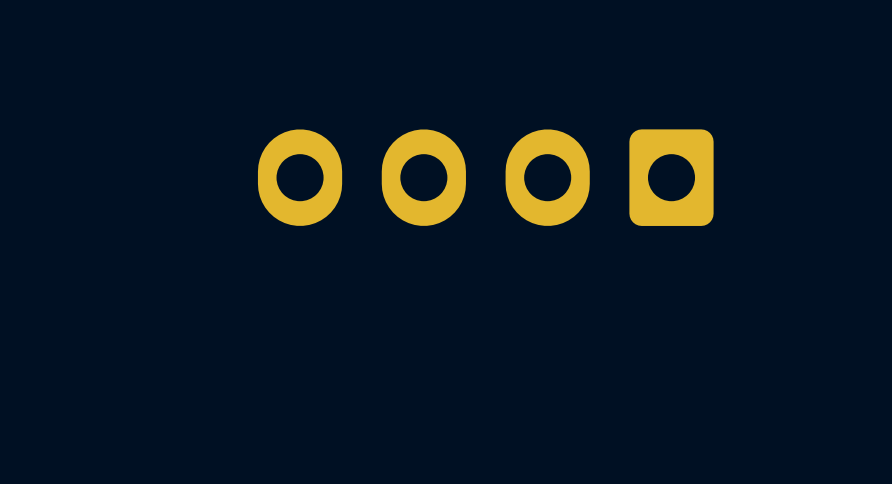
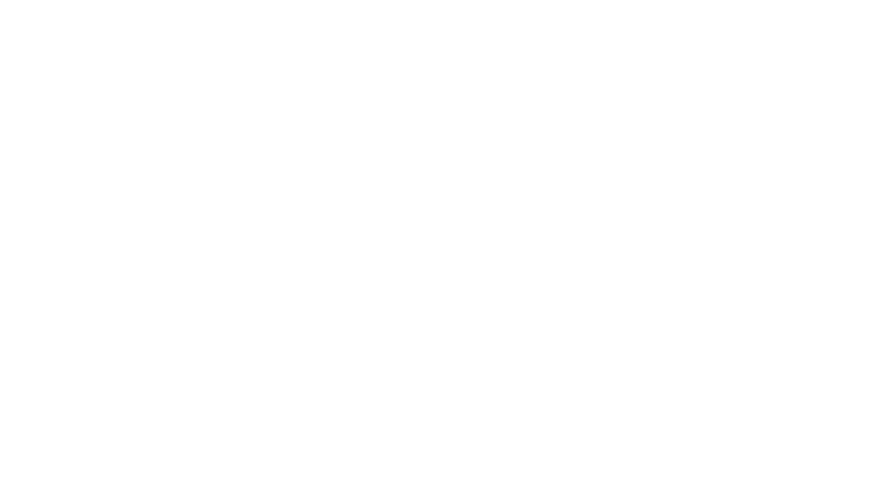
part: (485, 177) -> none

